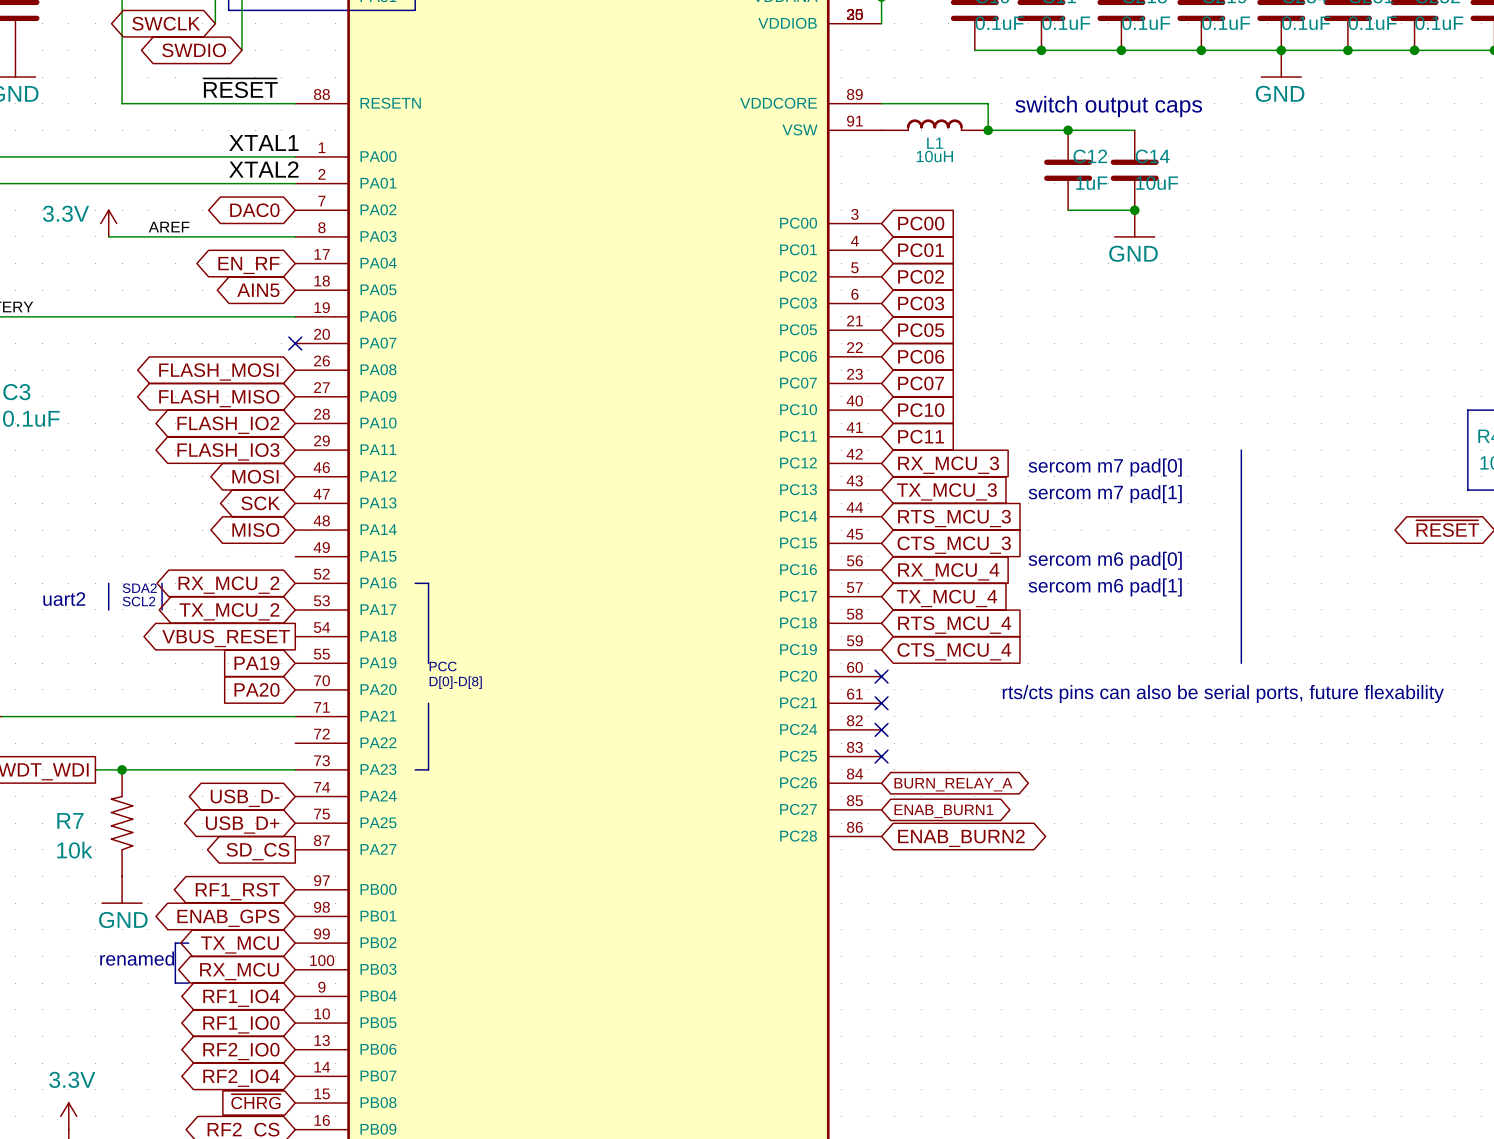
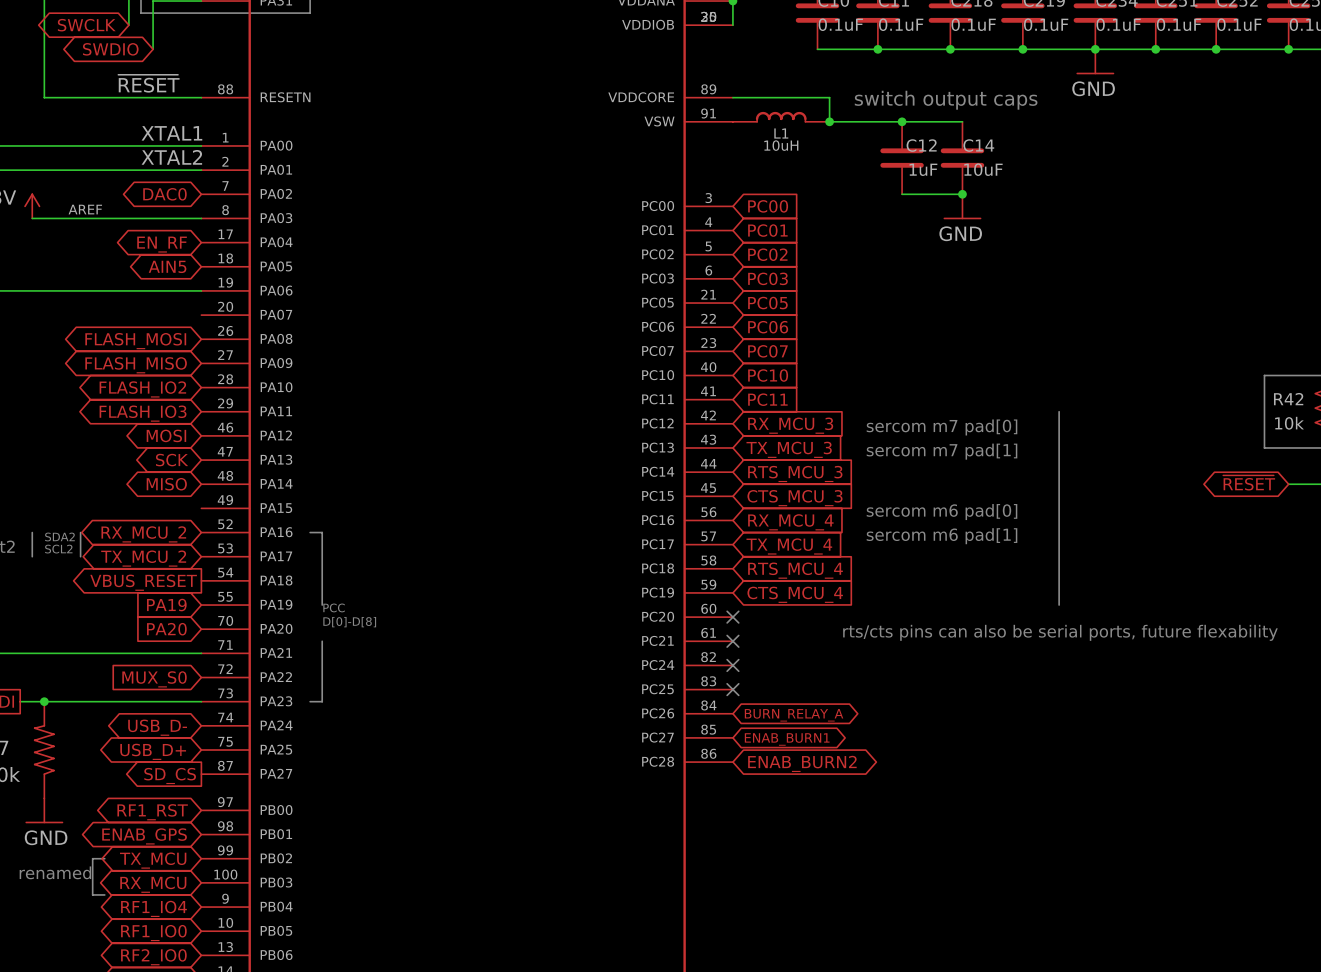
no-connect mark: (295, 343) -> none
global label: none -> MUX_S0 (154, 679)

